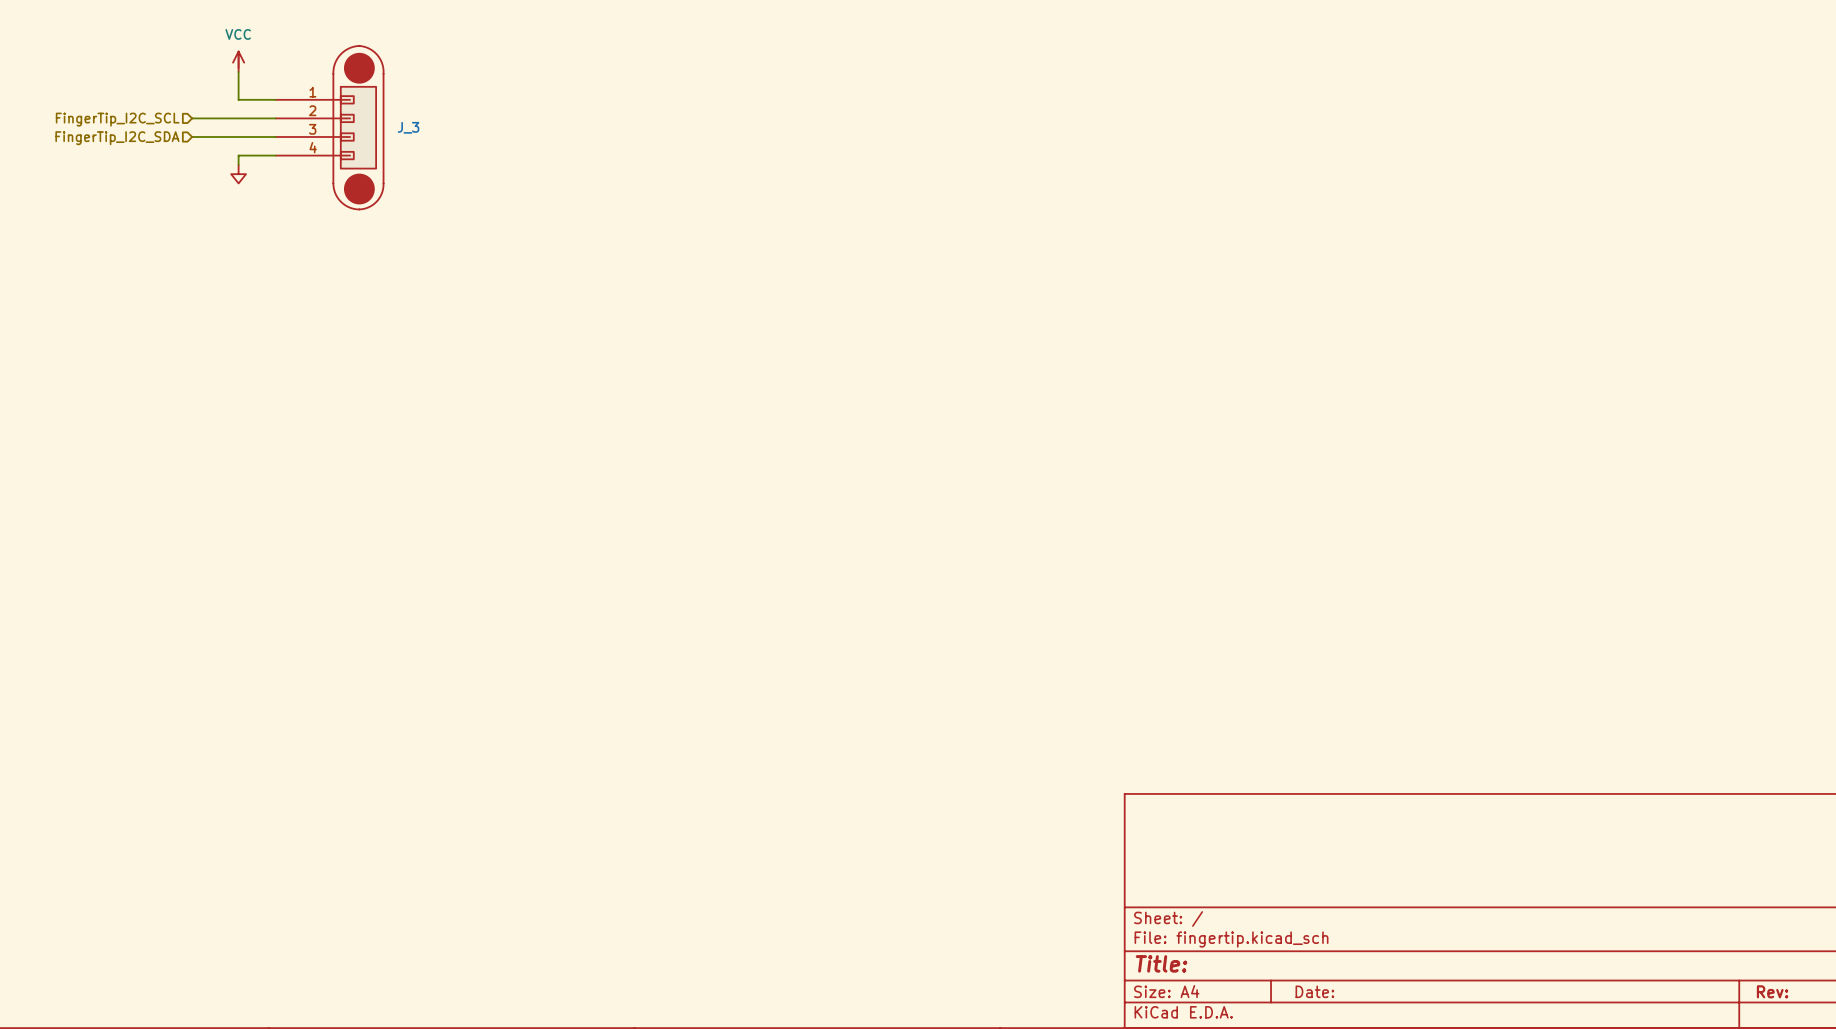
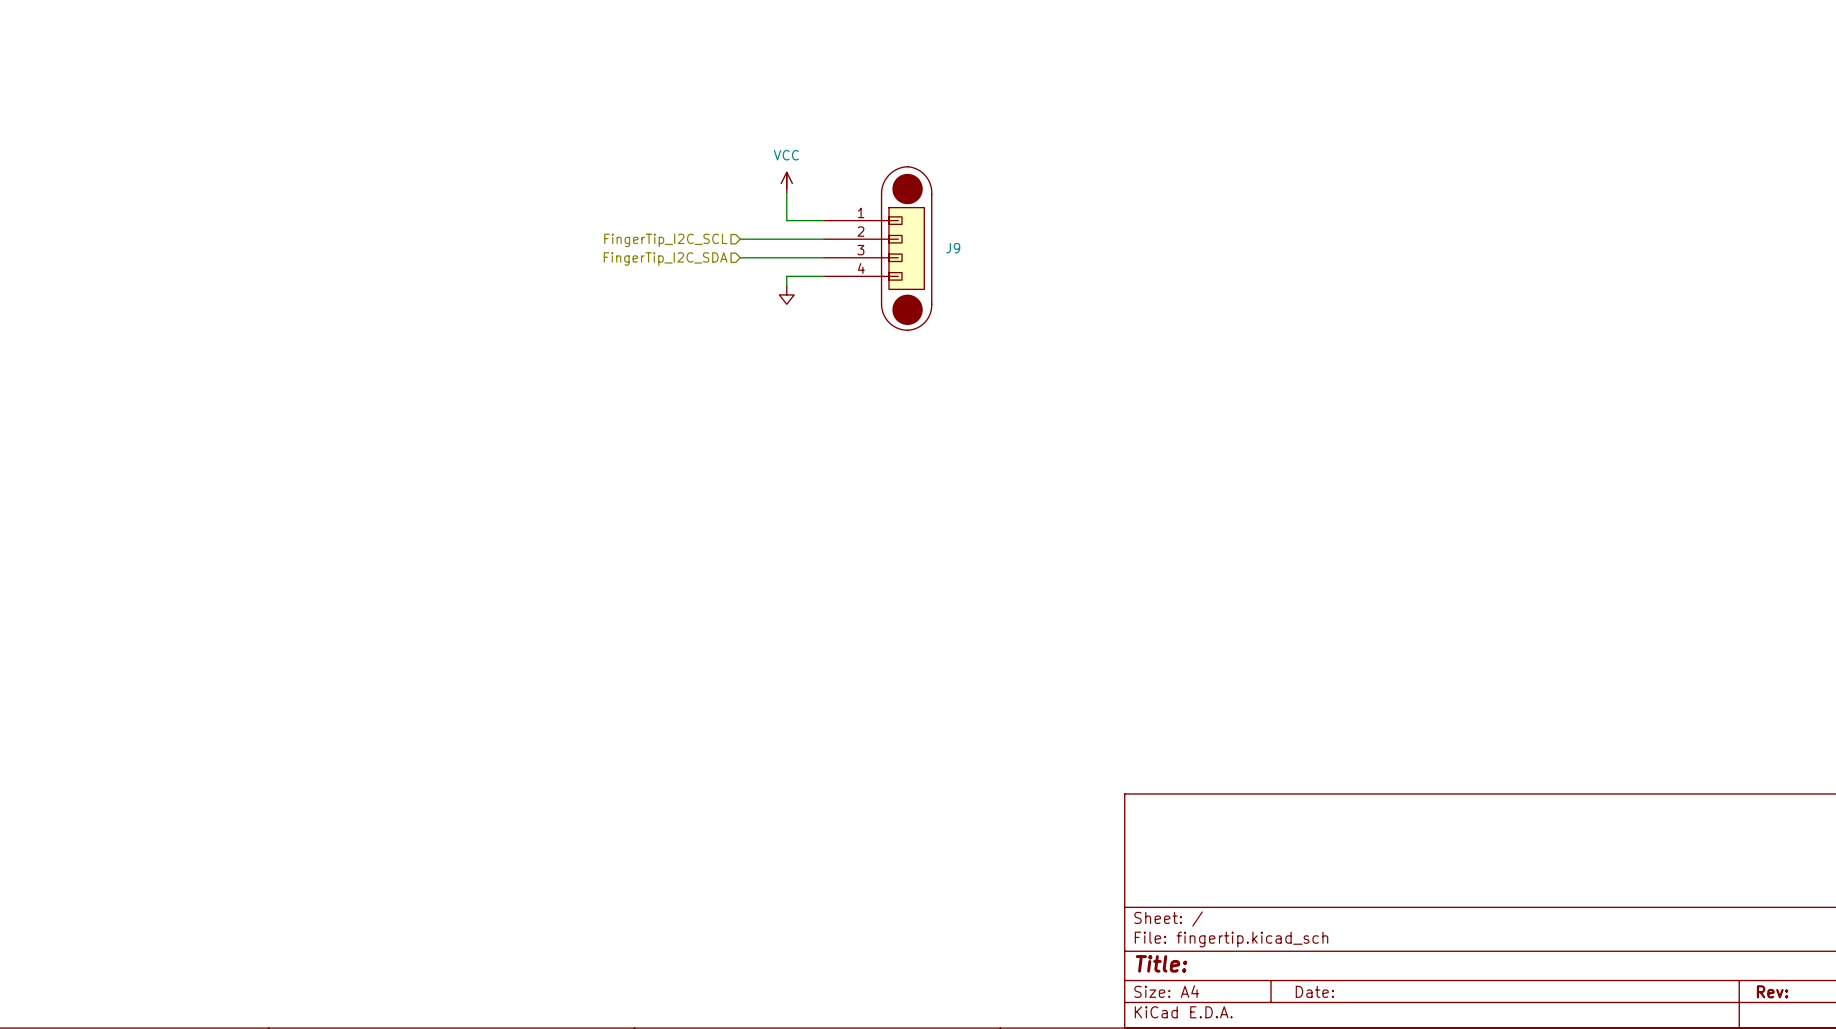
power symbol: VCC (238, 61) -> none
wire: (238, 71) (238, 99) (275, 99) -> none
wire: (192, 118) (275, 118) -> none
hierarchical label: FingerTip_I2C_SCL (117, 119) -> none
J_3: (329, 127) -> none
wire: (192, 136) (275, 136) -> none
hierarchical label: FingerTip_I2C_SDA (117, 138) -> none
wire: (275, 155) (238, 155) (238, 164) -> none
power symbol: (238, 174) -> none
power symbol: none -> VCC (786, 182)
wire: none -> (786, 192) (786, 220) (823, 220)
wire: none -> (740, 239) (823, 239)
hierarchical label: none -> FingerTip_I2C_SCL (665, 240)
J9: none -> (877, 248)
wire: none -> (740, 257) (823, 257)
hierarchical label: none -> FingerTip_I2C_SDA (665, 258)
wire: none -> (823, 276) (786, 276) (786, 285)
power symbol: none -> (786, 294)

